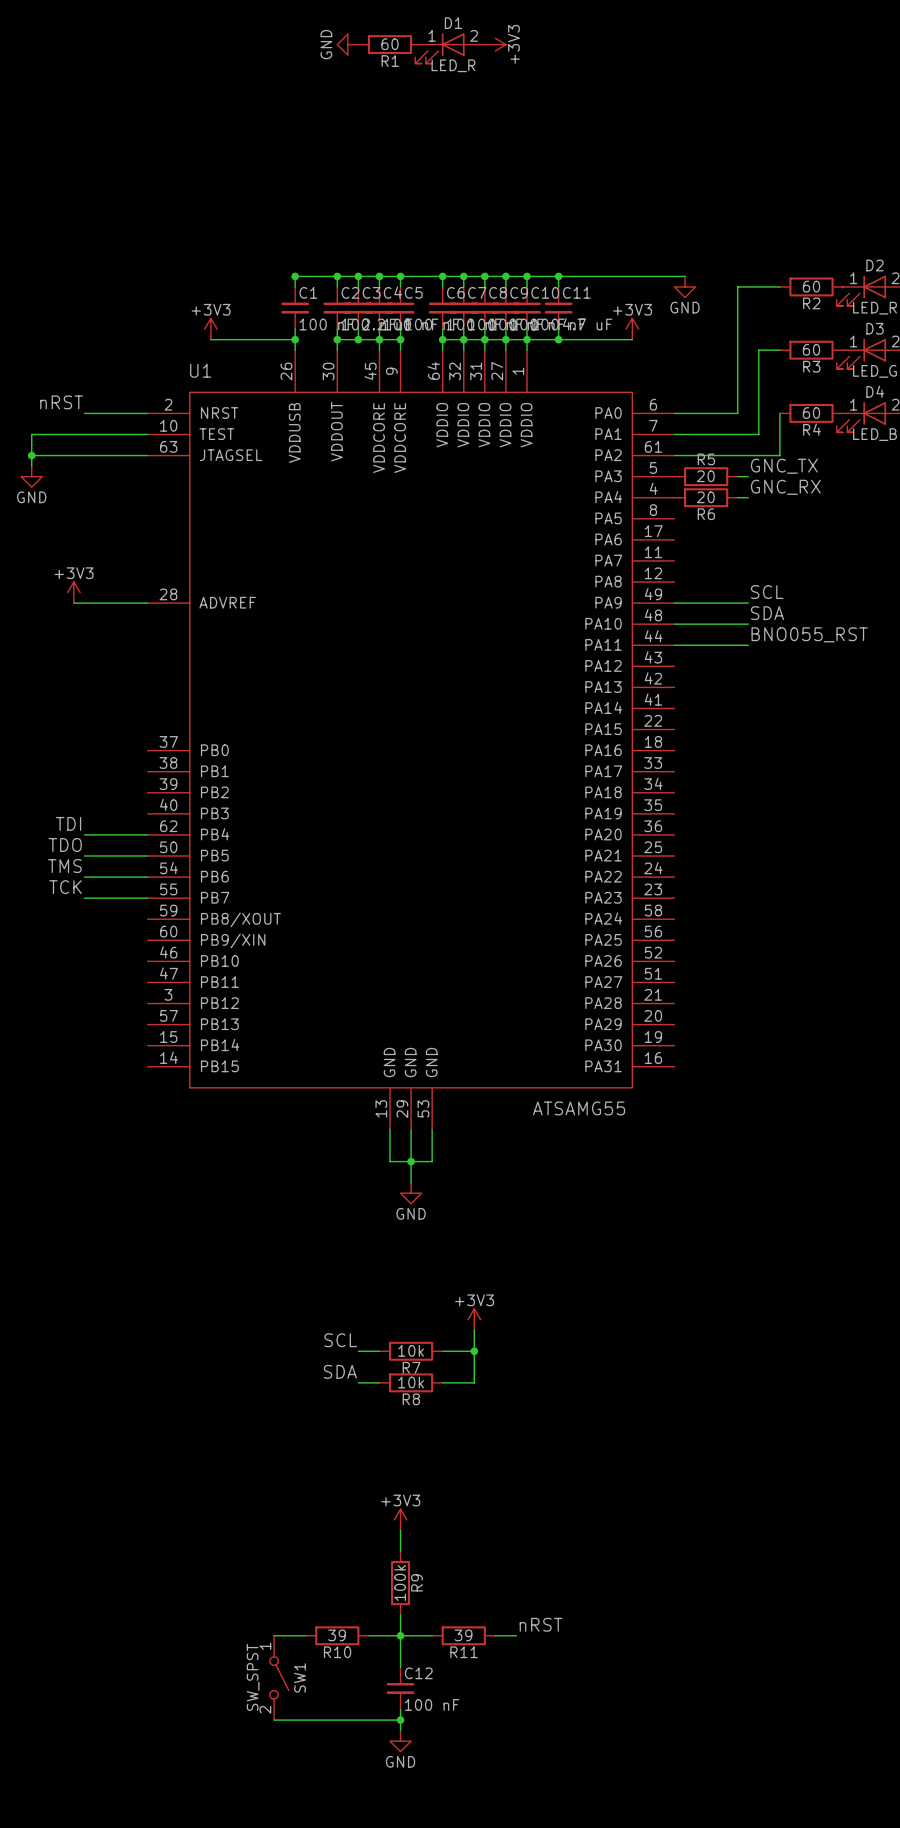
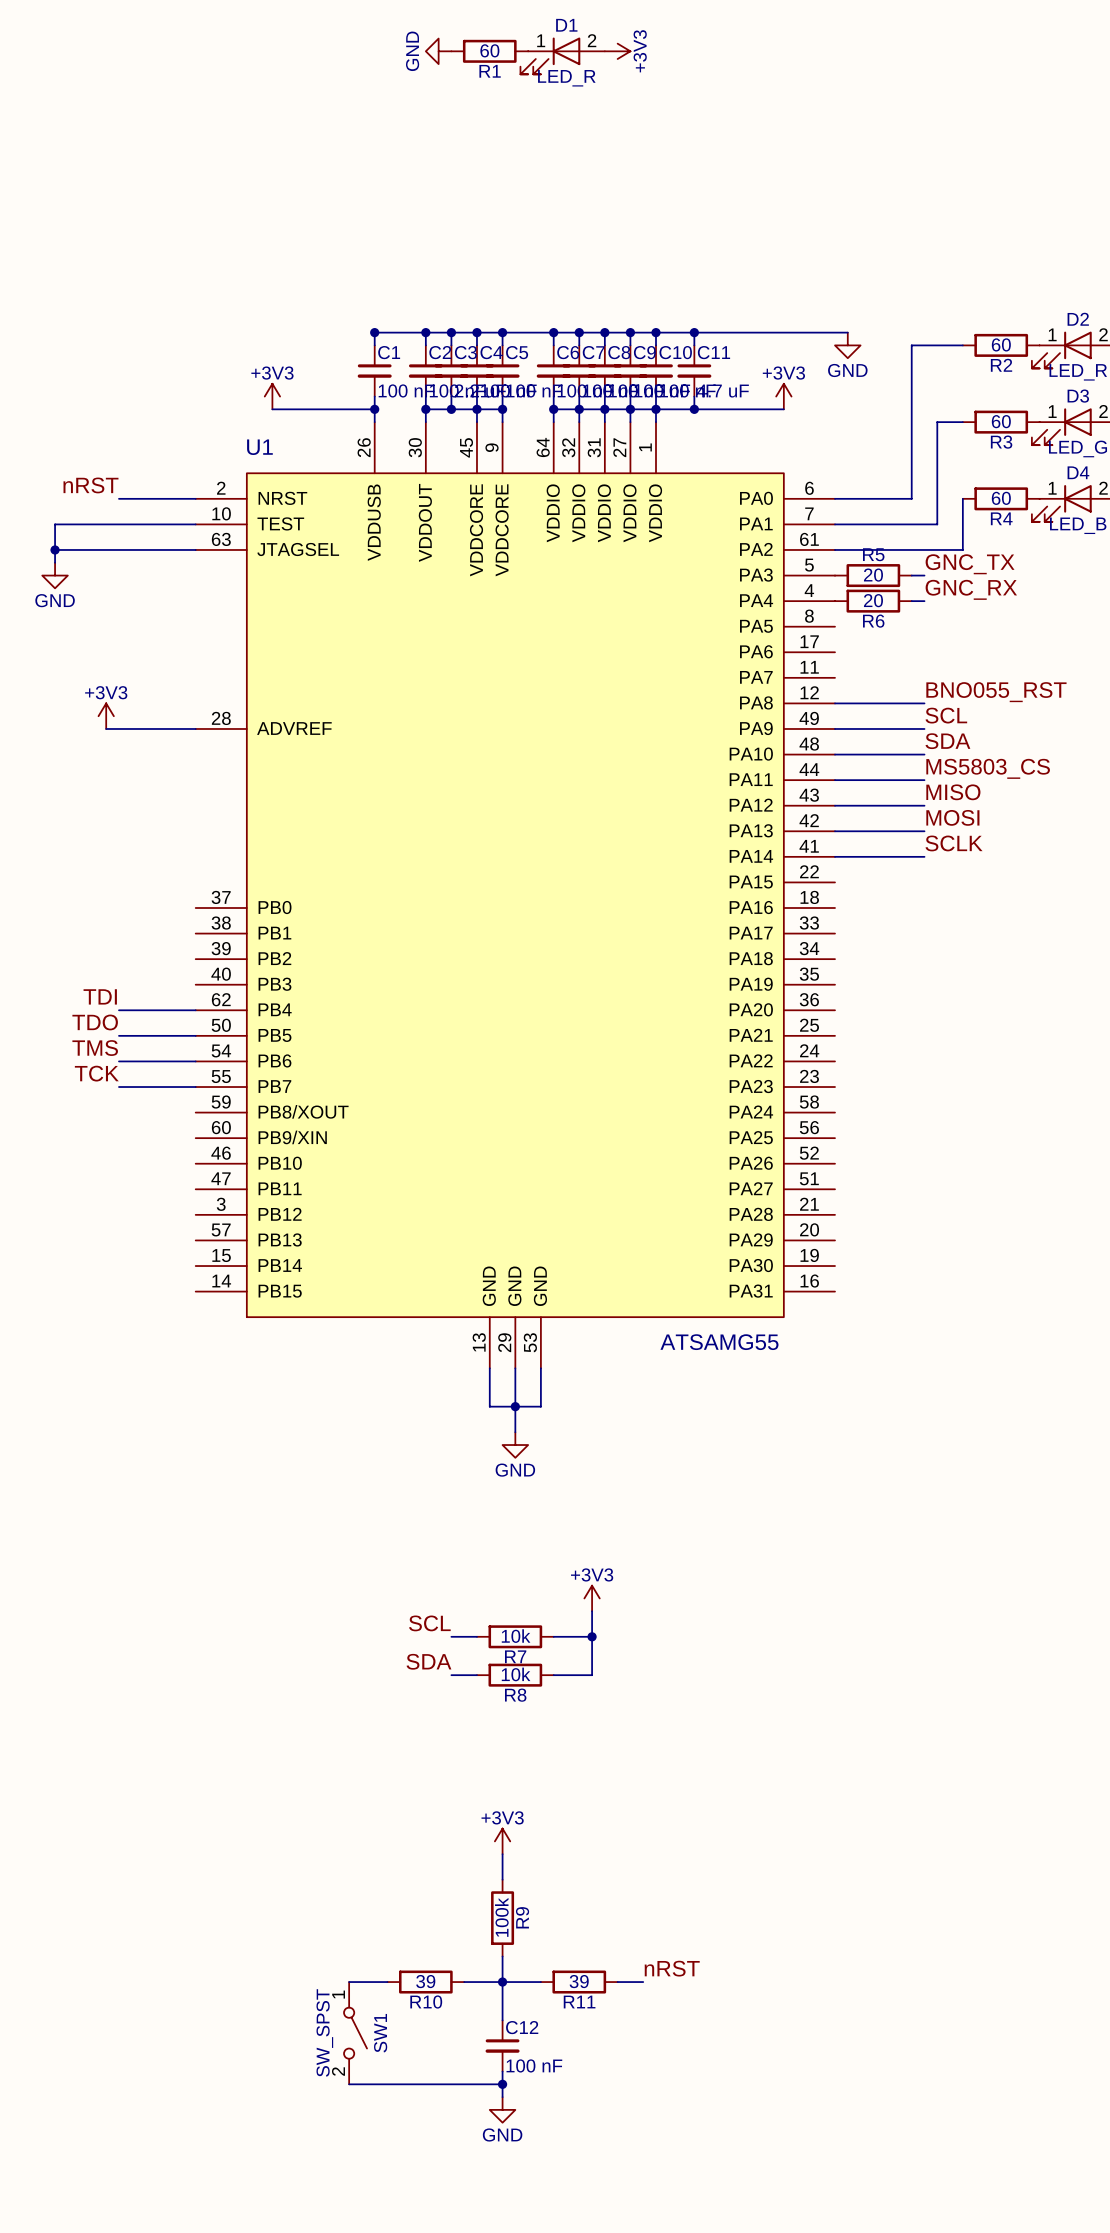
label: none -> BNO055_RST (996, 692)
wire: none -> (835, 703) (924, 703)
label: BNO055_RST (809, 634) -> MS5803_CS (988, 768)
label: none -> MISO (953, 792)
wire: none -> (835, 805) (924, 805)
label: none -> MOSI (952, 817)
wire: none -> (835, 831) (924, 831)
label: none -> SCLK (954, 843)
wire: none -> (835, 856) (924, 856)

